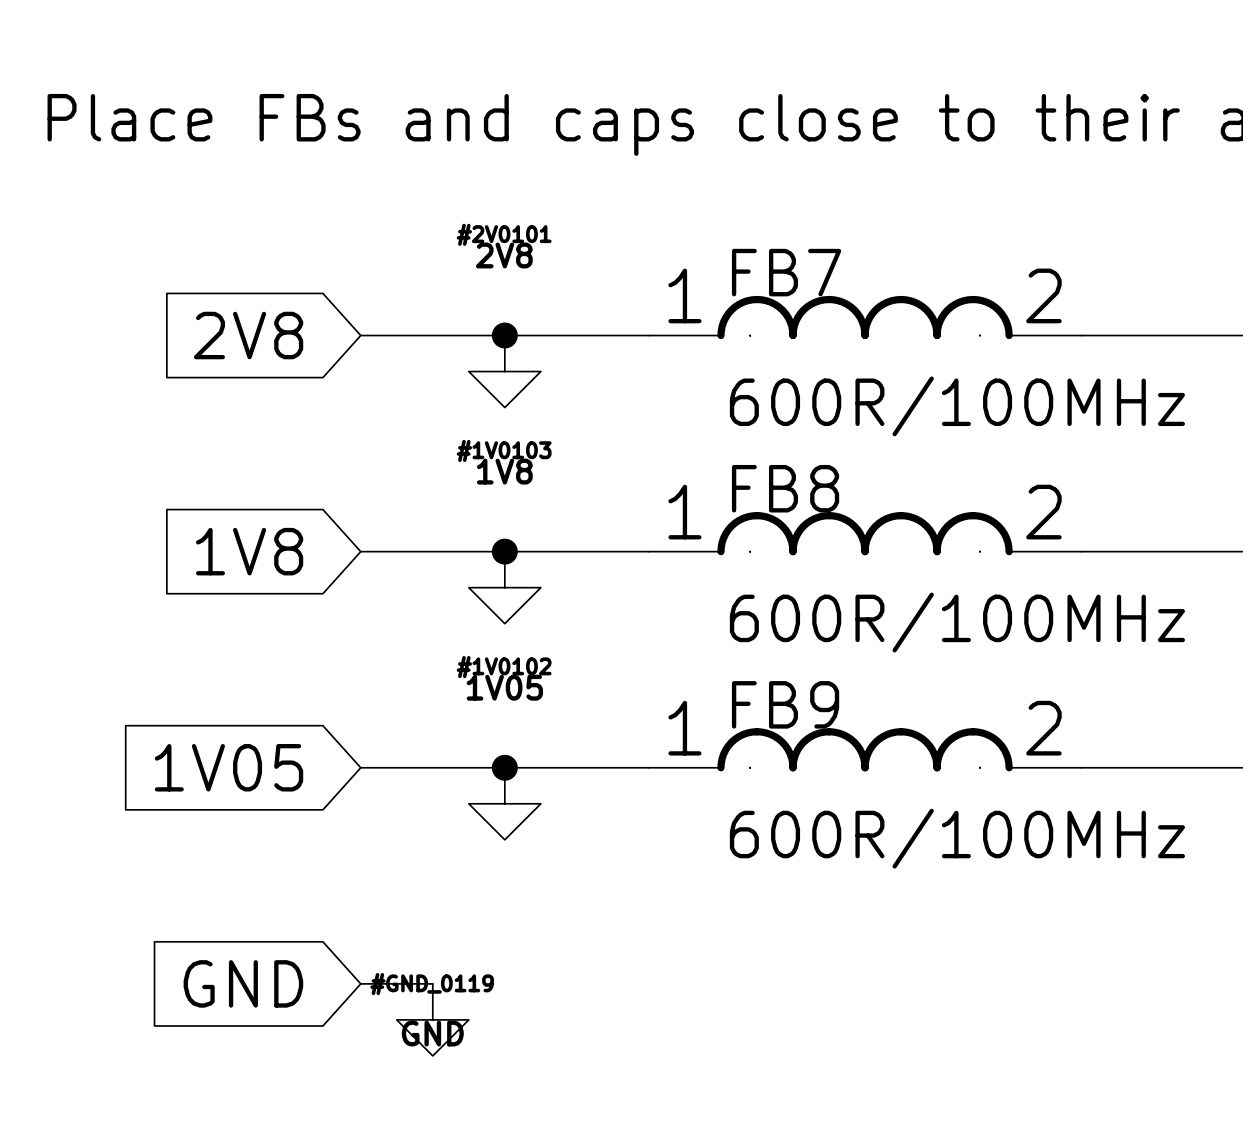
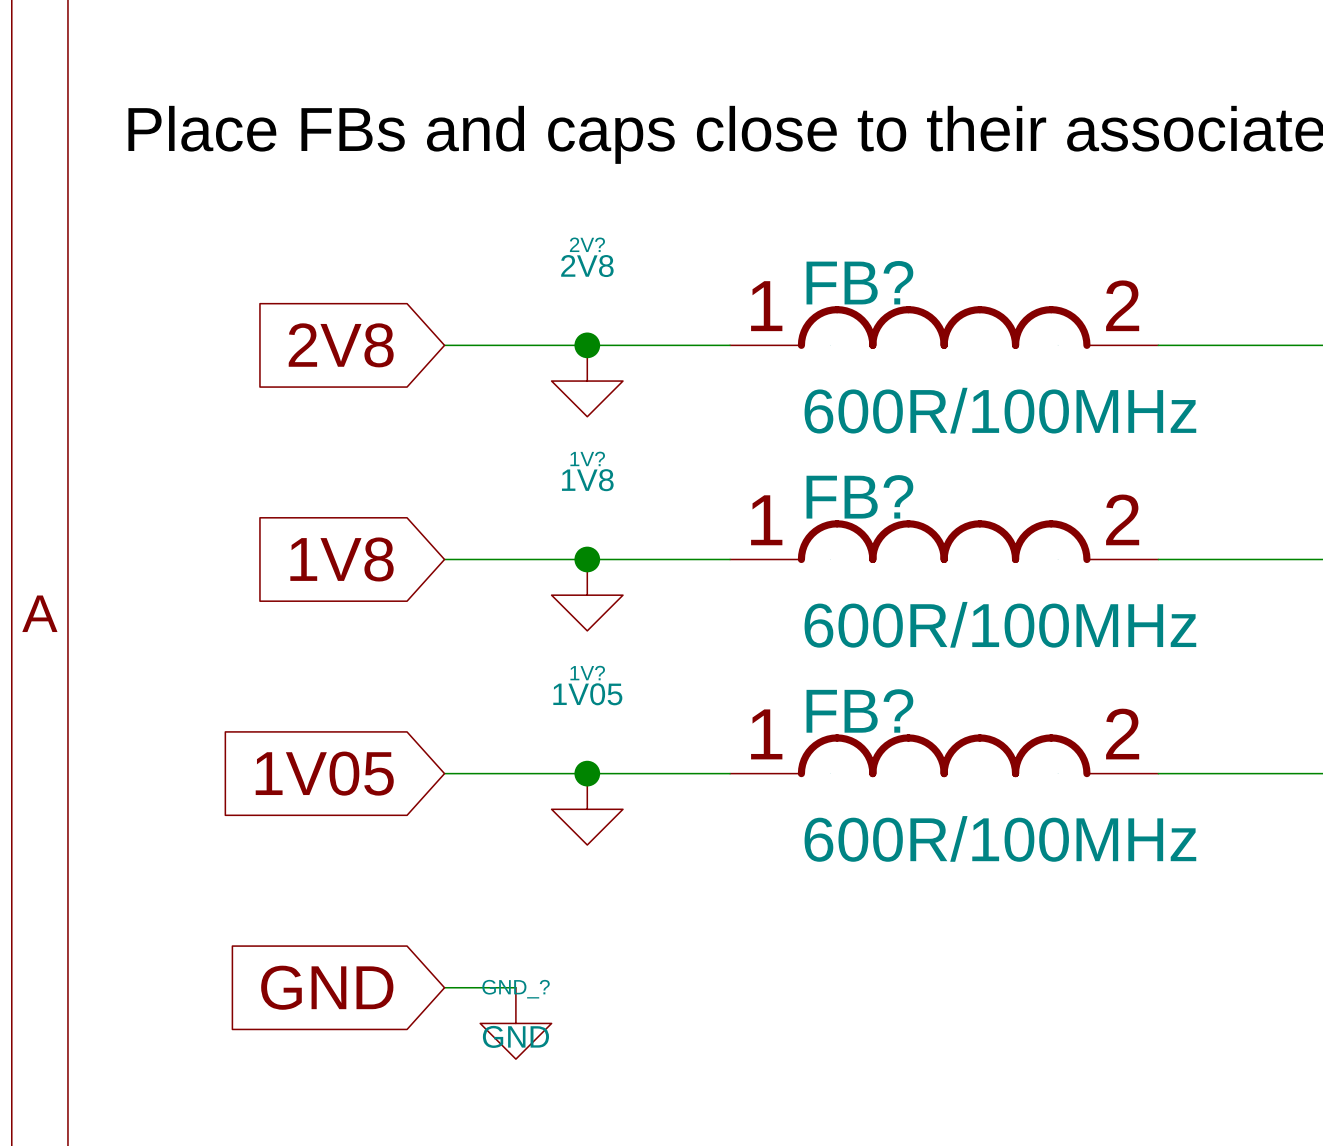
#2V0101 name: #2V0101 (504, 234) -> 2V? (587, 244)
FB7 name: FB7 (786, 272) -> FB? (859, 282)
#1V0103 name: #1V0103 (504, 450) -> 1V? (587, 458)
FB8 name: FB8 (785, 488) -> FB? (859, 496)
#1V0102 name: #1V0102 (504, 667) -> 1V? (587, 673)
FB9 name: FB9 (785, 704) -> FB? (859, 710)
#GND_0119 name: #GND_0119 (432, 984) -> GND_? (516, 989)

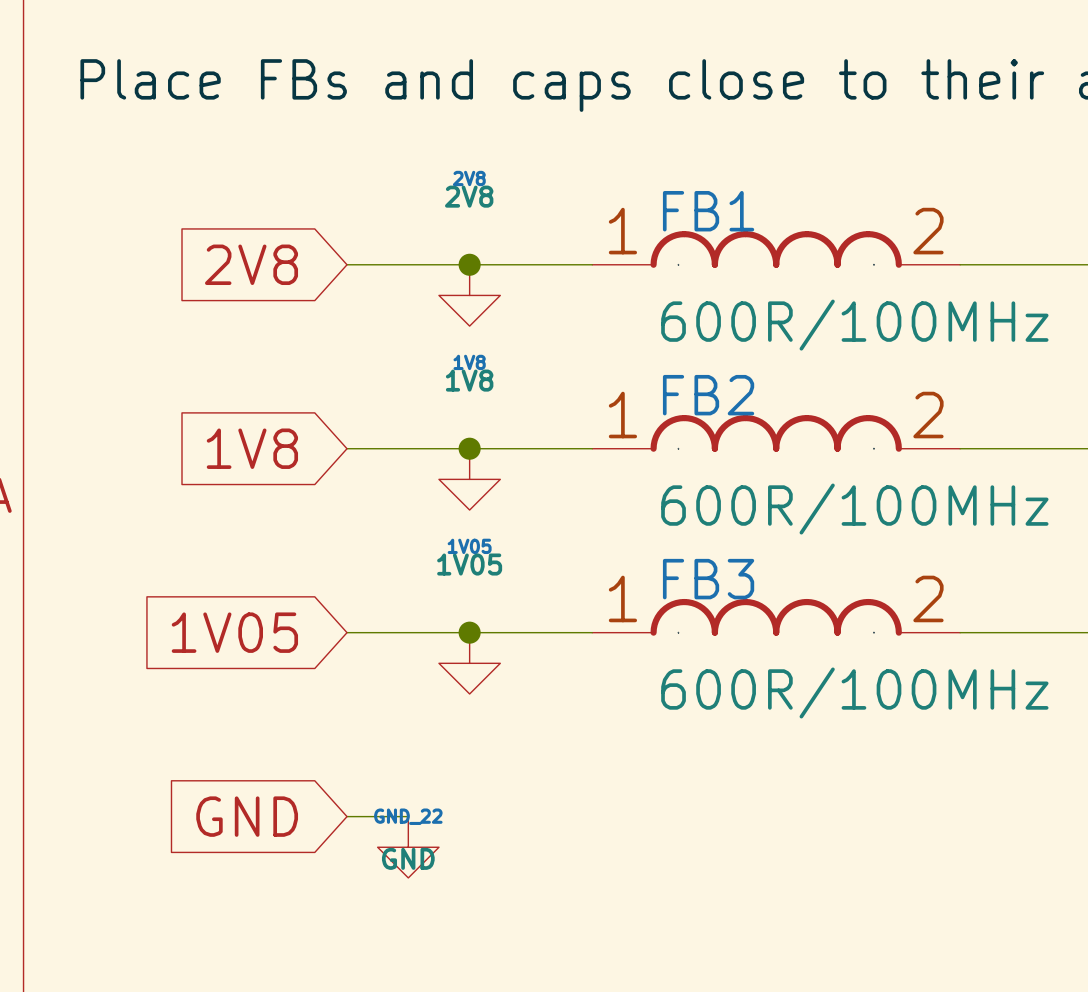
2V? name: 2V? (587, 244) -> 2V8 (469, 178)
FB? name: FB? (859, 282) -> FB1 (708, 211)
1V? name: 1V? (587, 458) -> 1V8 (469, 362)
FB? name: FB? (859, 496) -> FB2 (708, 395)
1V? name: 1V? (587, 673) -> 1V05 (469, 546)
FB? name: FB? (859, 710) -> FB3 (708, 579)
GND_? name: GND_? (516, 989) -> GND_22 (408, 816)

